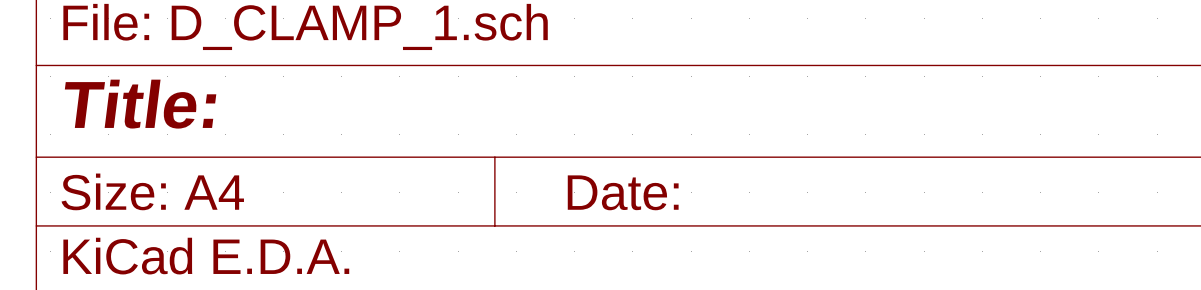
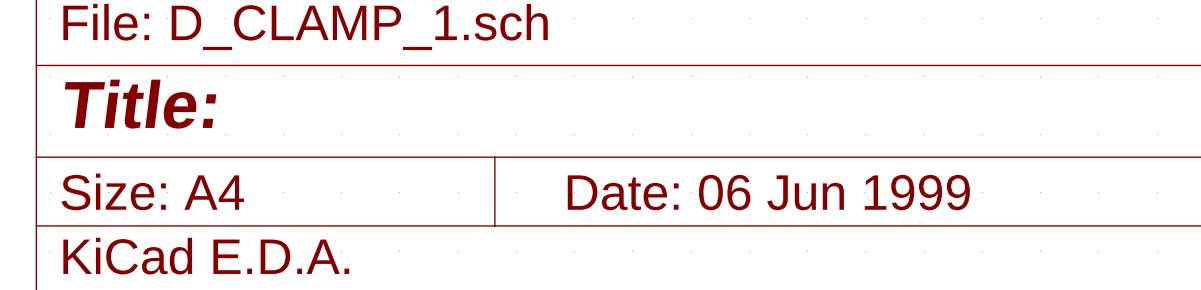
title block: Date: (623, 192) -> Date: 06 Jun 1999 (768, 192)

